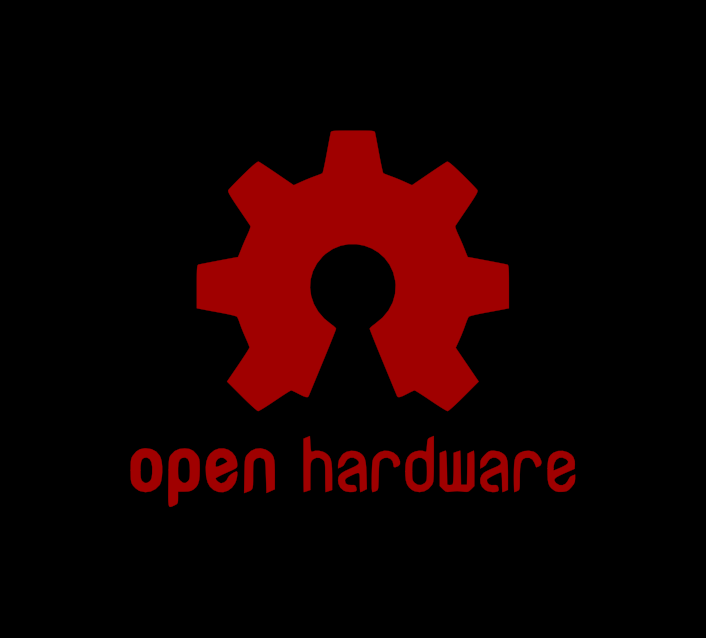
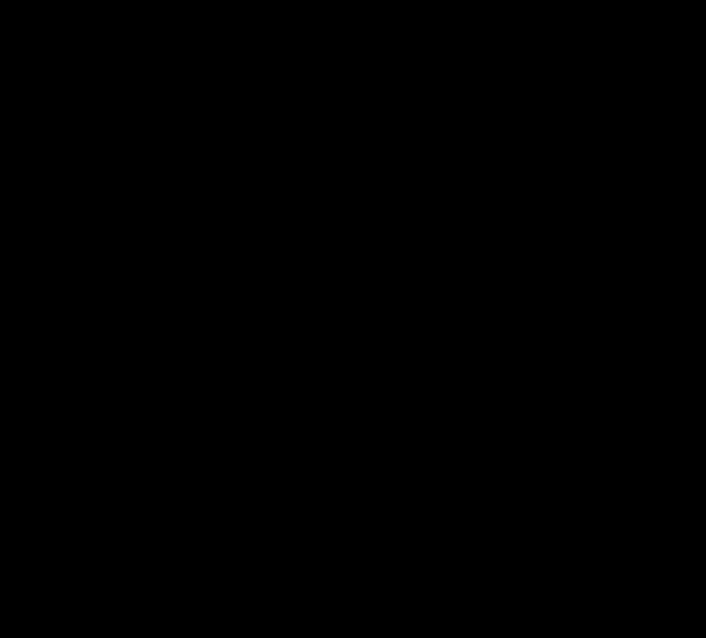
drawing: [130, 130, 576, 508] -> none

